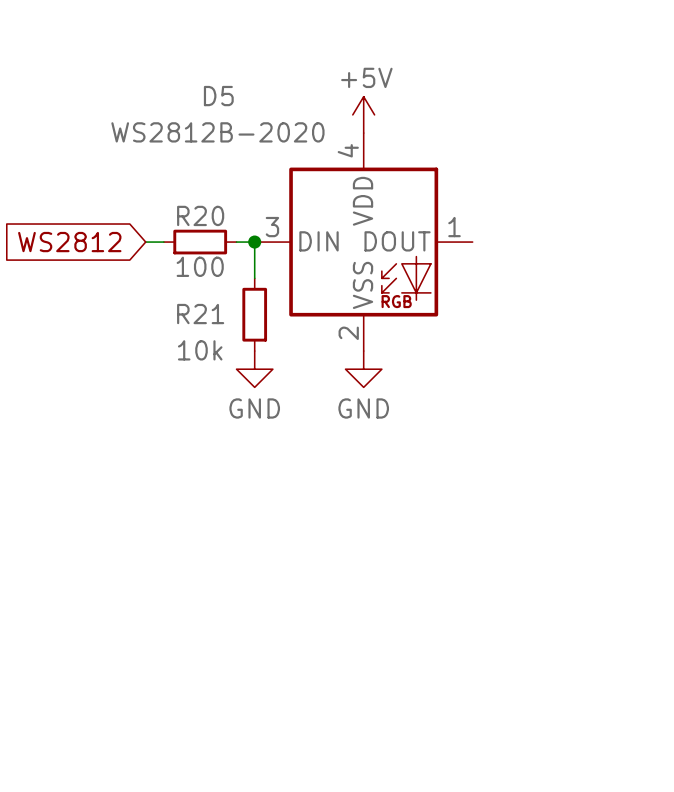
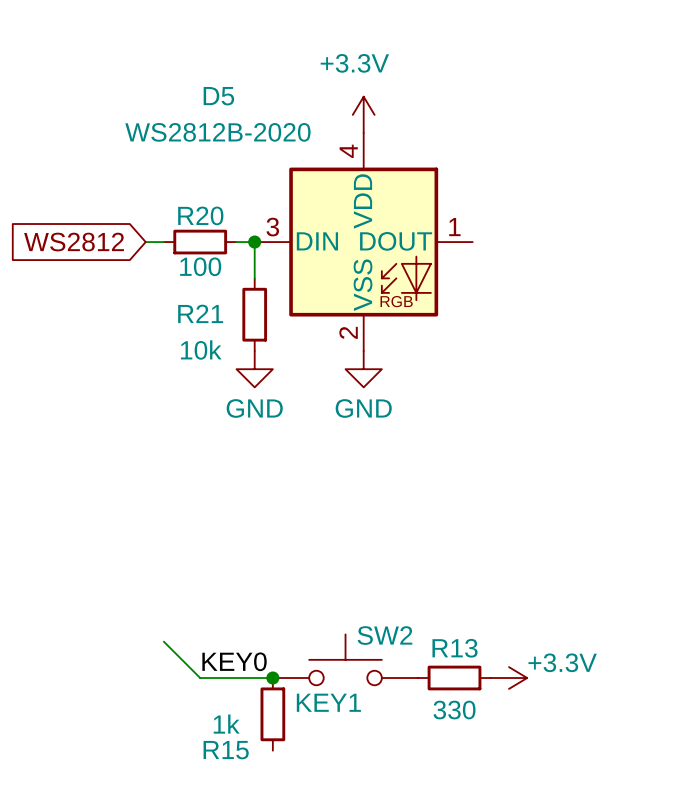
power symbol: +5V (363, 114) -> +3.3V (363, 114)
wire: none -> (163, 641) (200, 678) (272, 678)
SW2: none -> KEY1 (345, 659)
label: none -> KEY0 (234, 661)
junction: none -> (272, 678)
R13: none -> 330 (454, 678)
power symbol: none -> +3.3V (509, 678)
R15: none -> 1k (272, 714)

